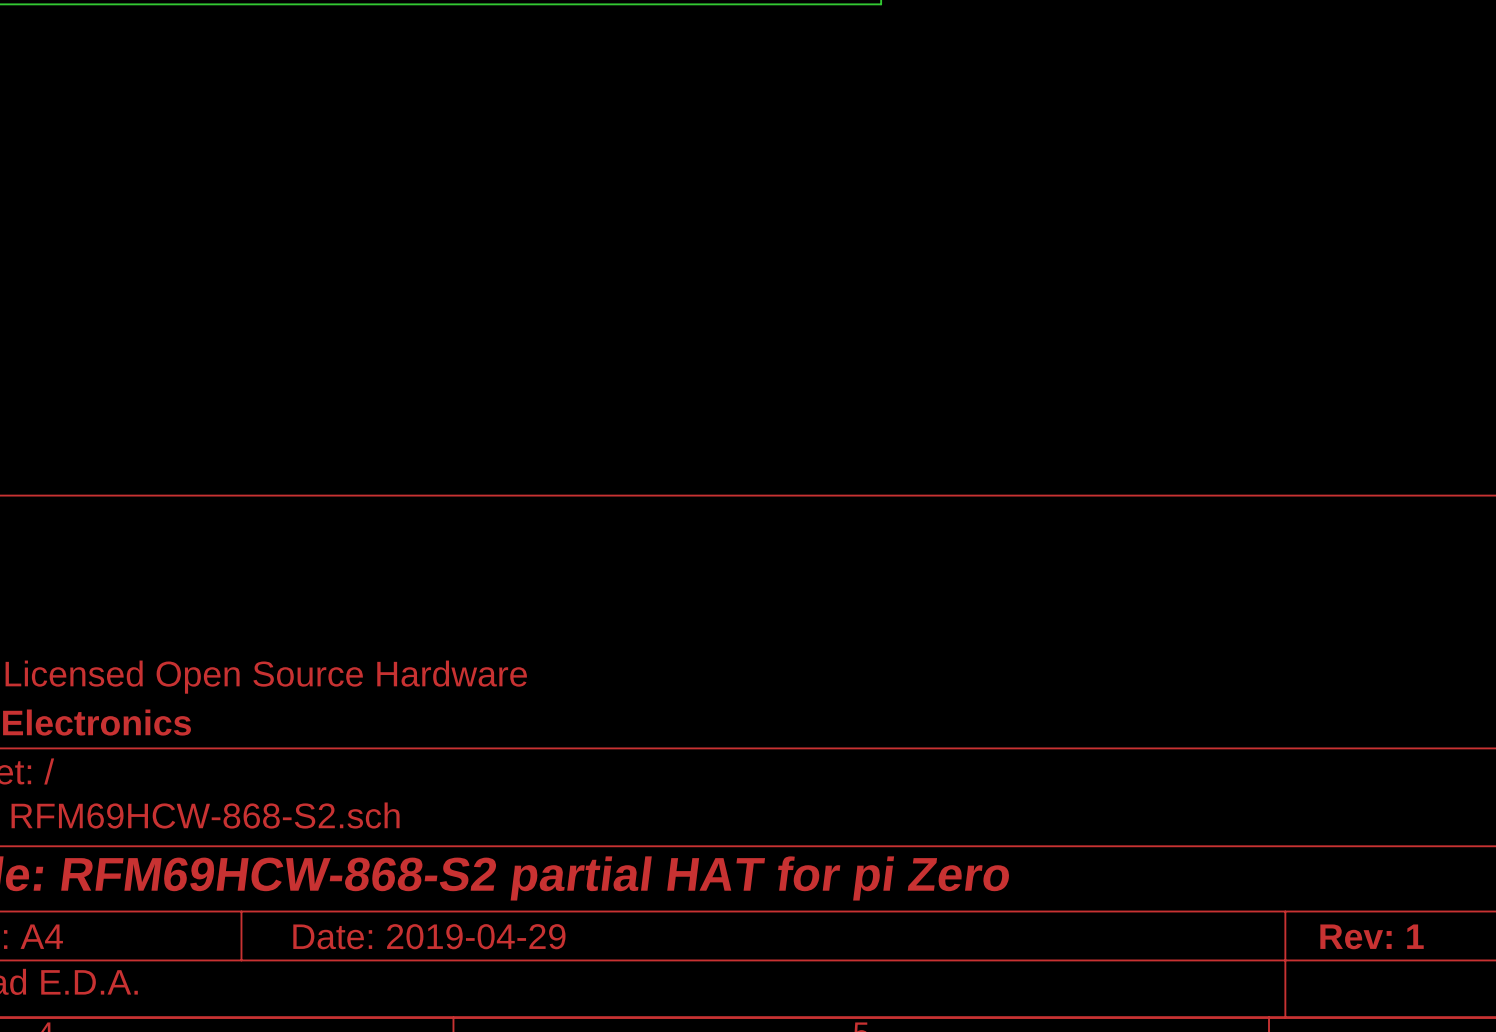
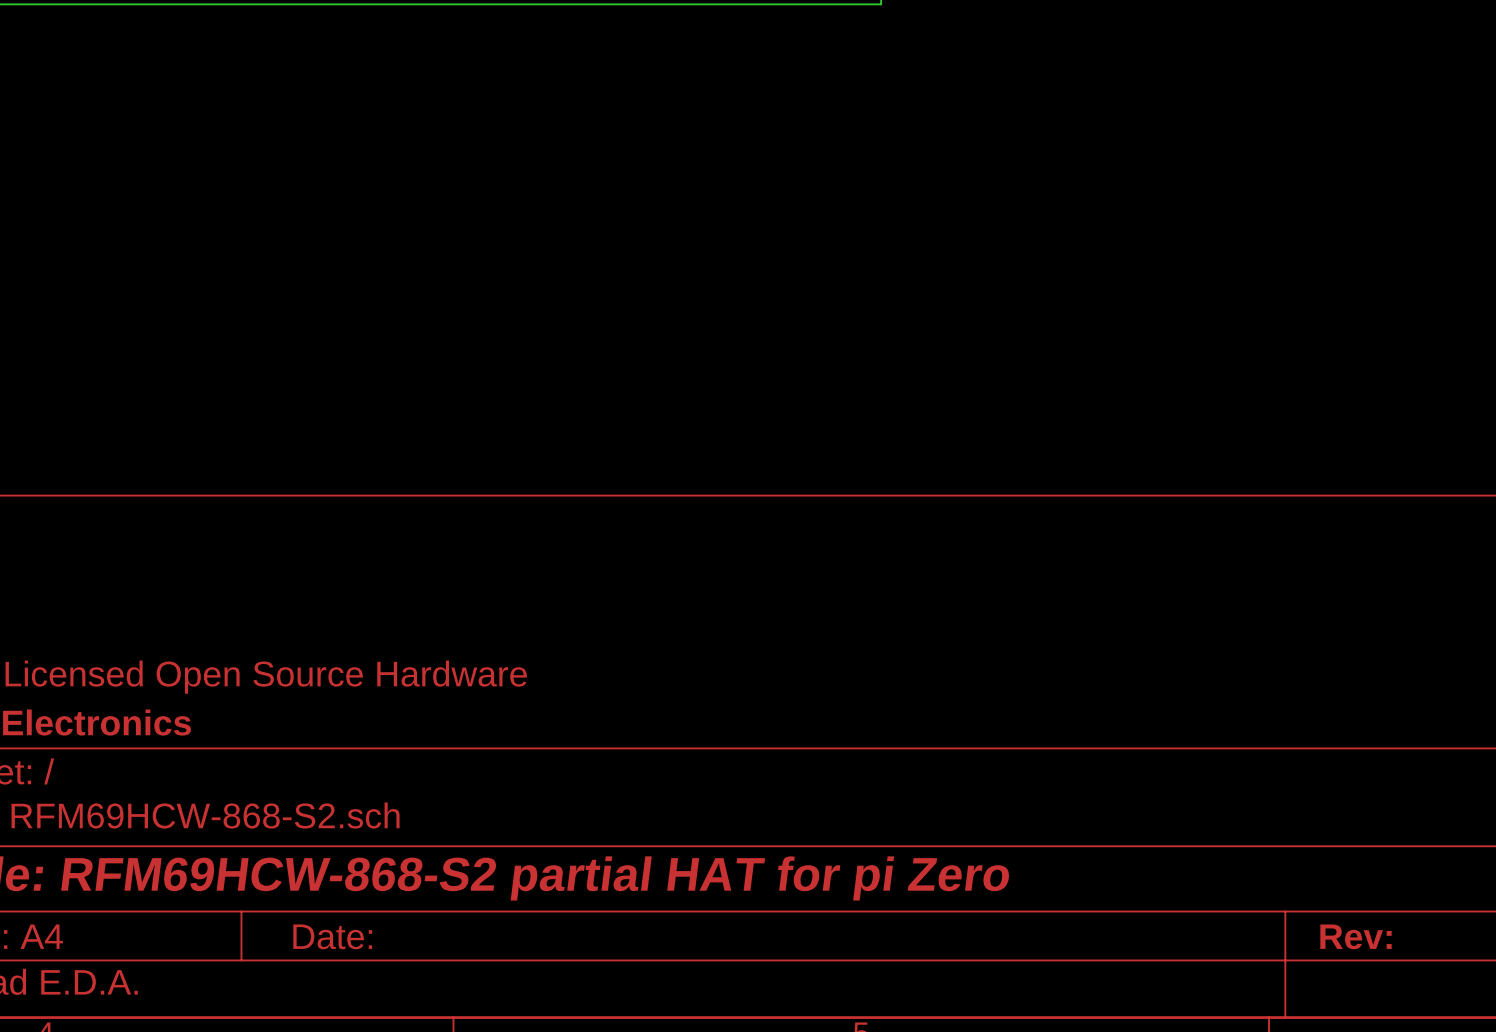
title block: Date: 2019-04-29 (429, 936) -> Date: (332, 936)
title block: Rev: 1 (1372, 936) -> Rev: (1355, 936)

